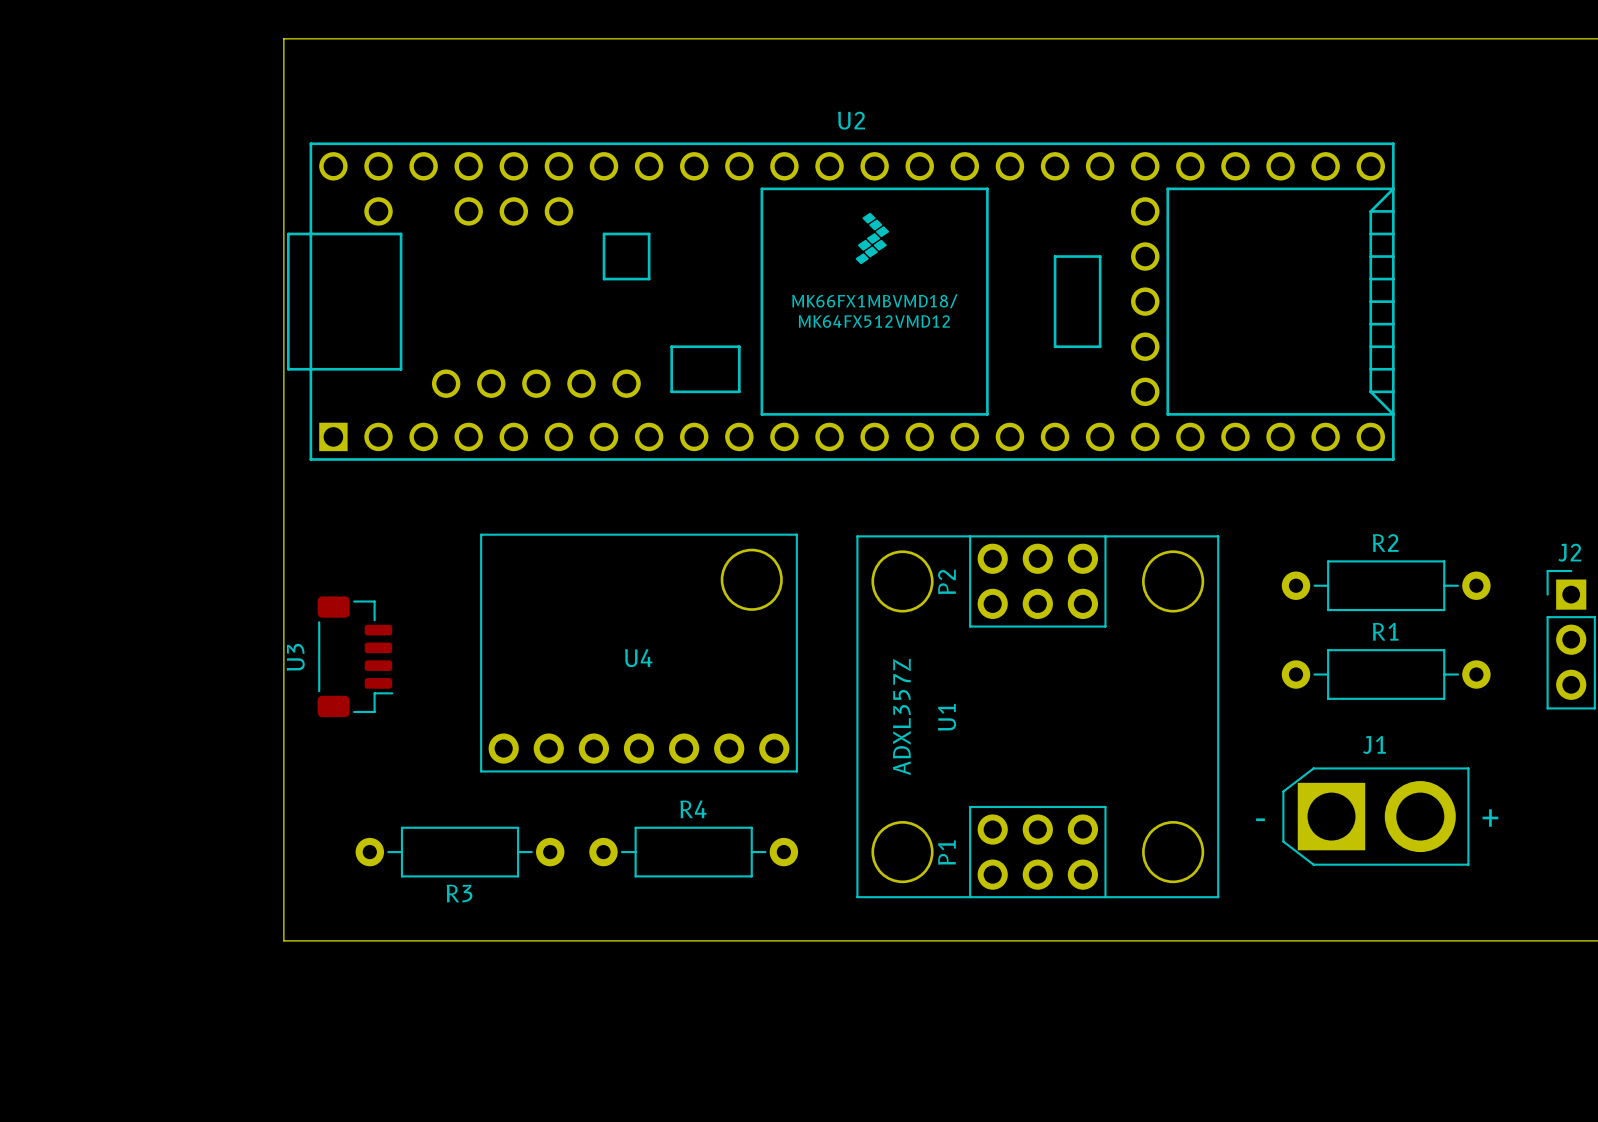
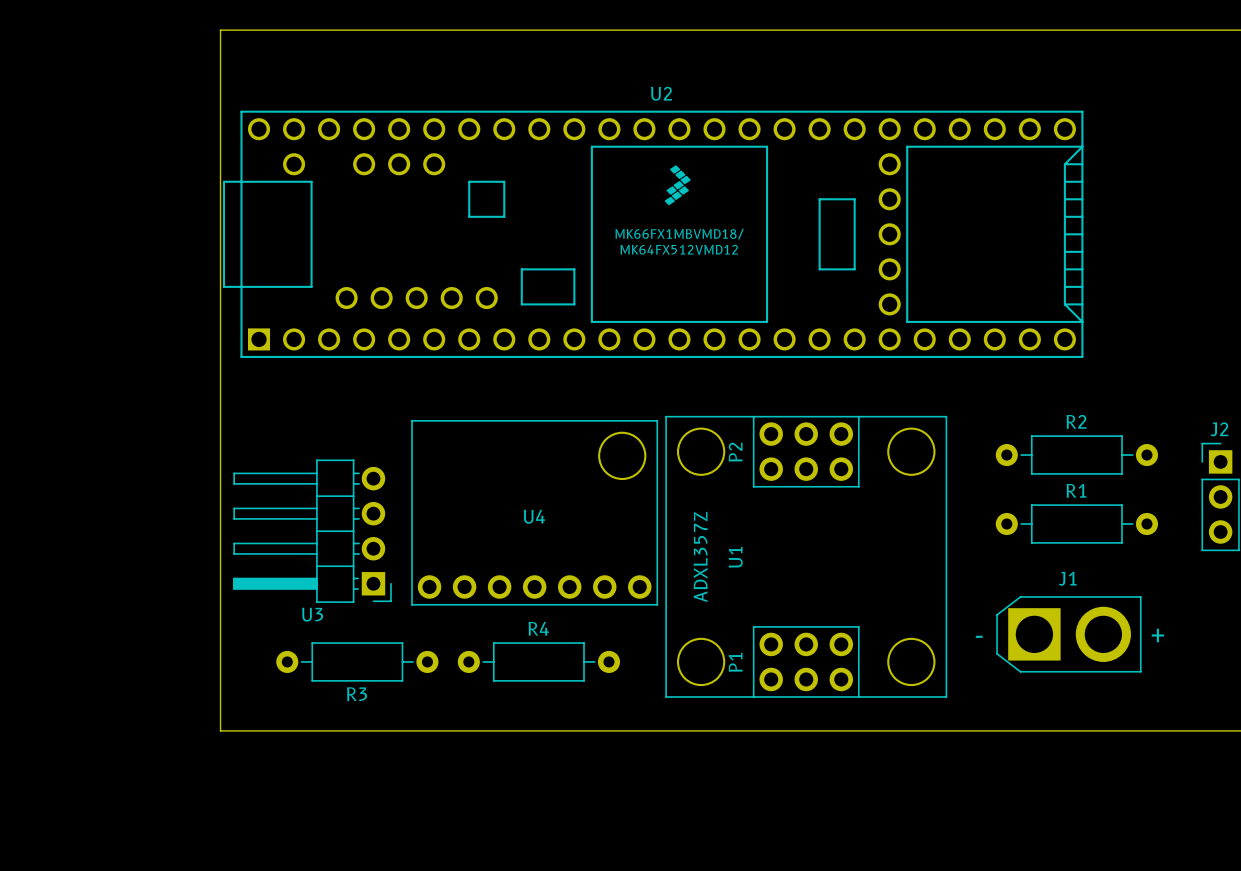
U3 footprint: [317, 596, 394, 718] -> [233, 459, 392, 603]
U4 position: (639, 653) -> (534, 512)
U3 name position: U3 (295, 657) -> U3 (312, 614)

